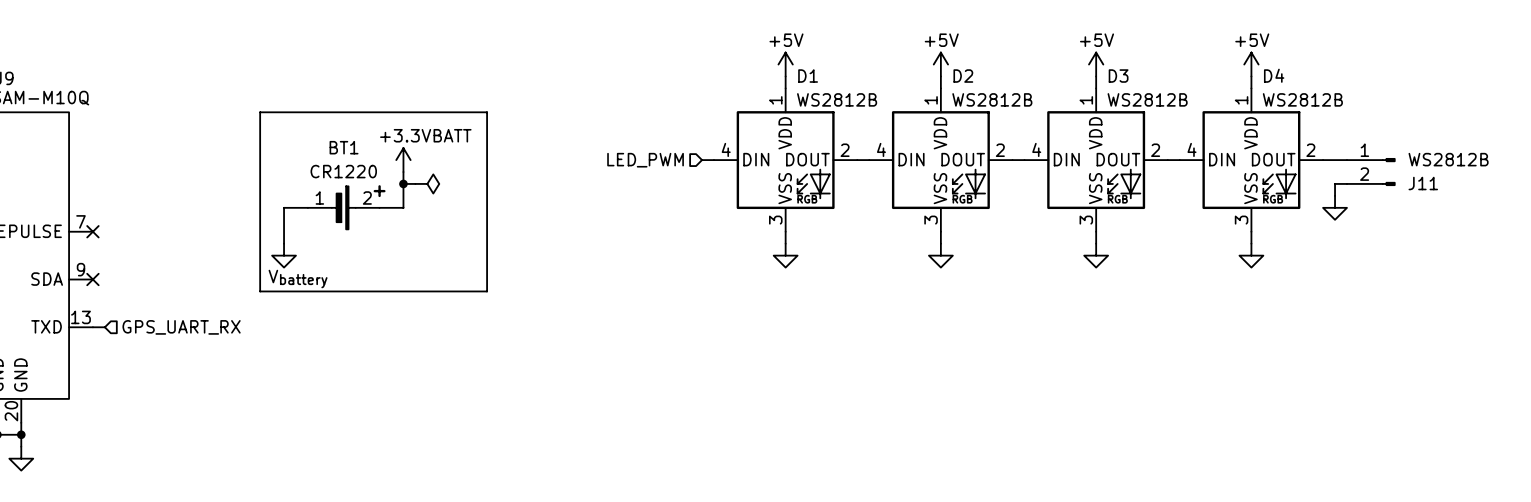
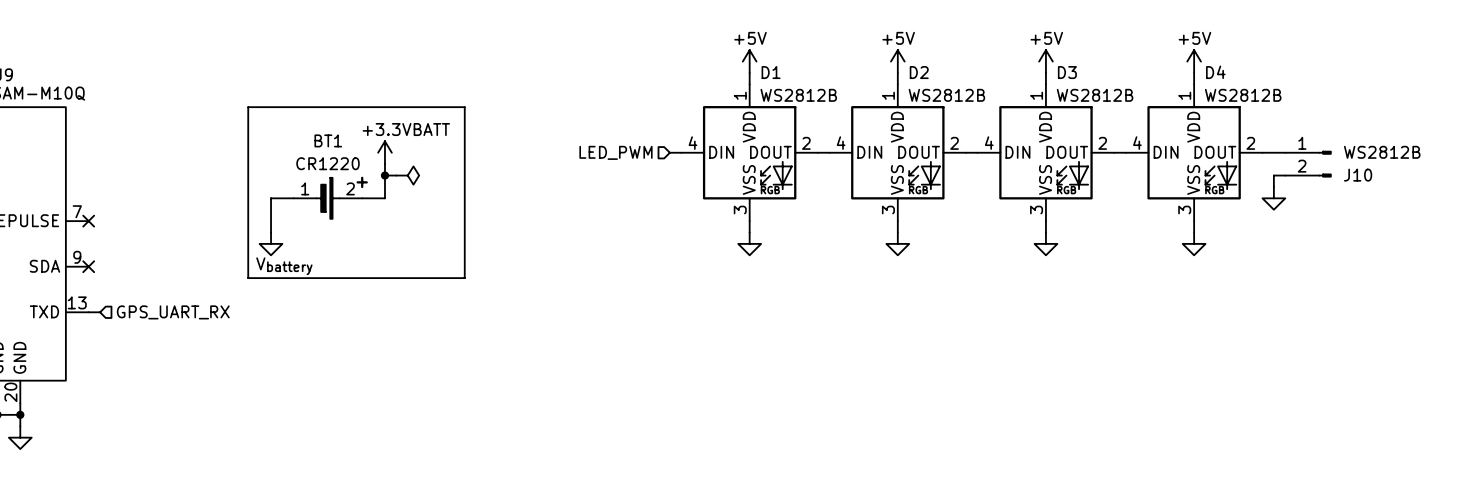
J11 name: J11 (1423, 183) -> J10 (1358, 175)

